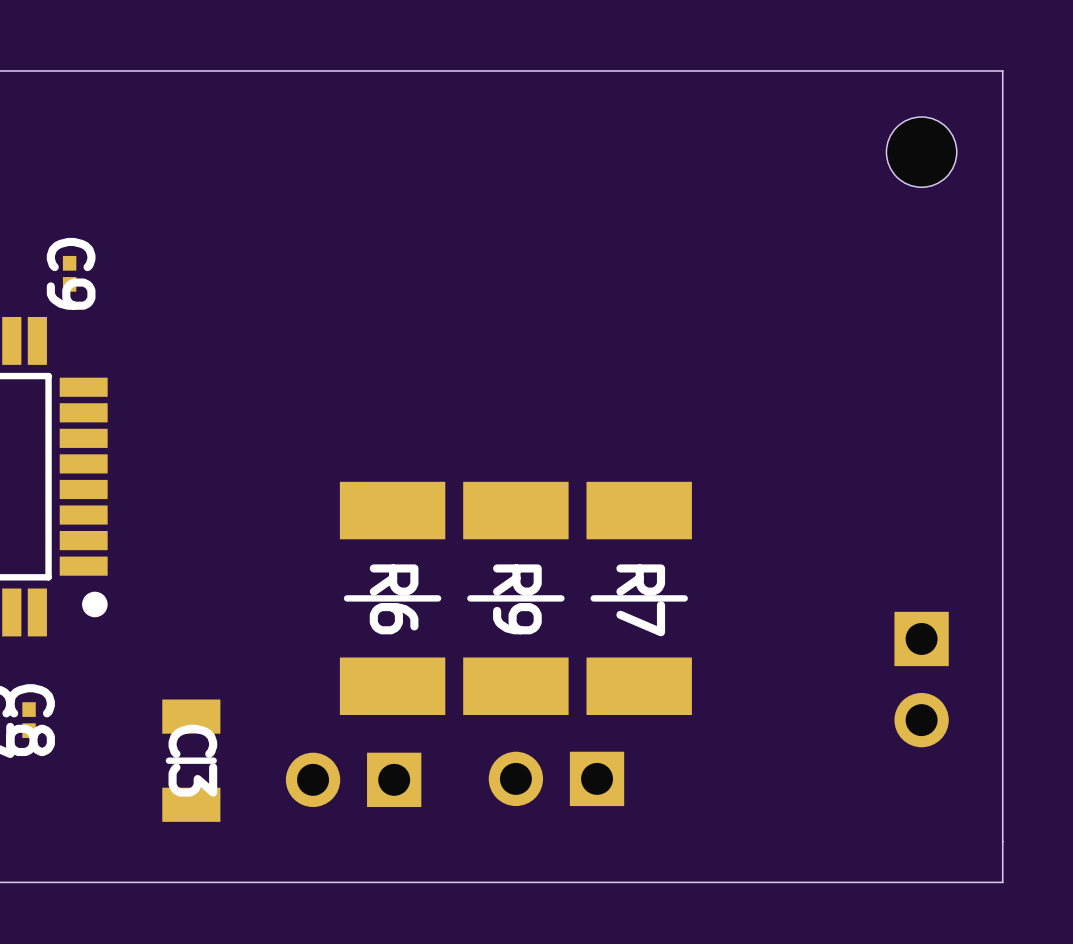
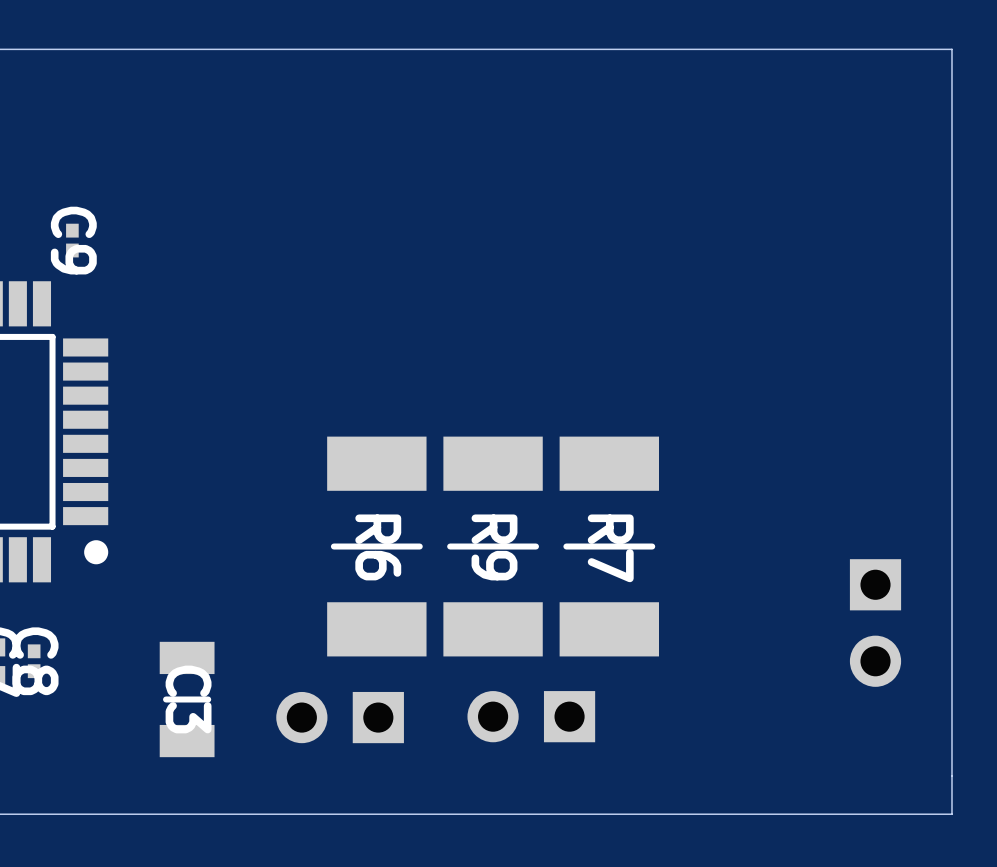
part: (921, 152) -> none

